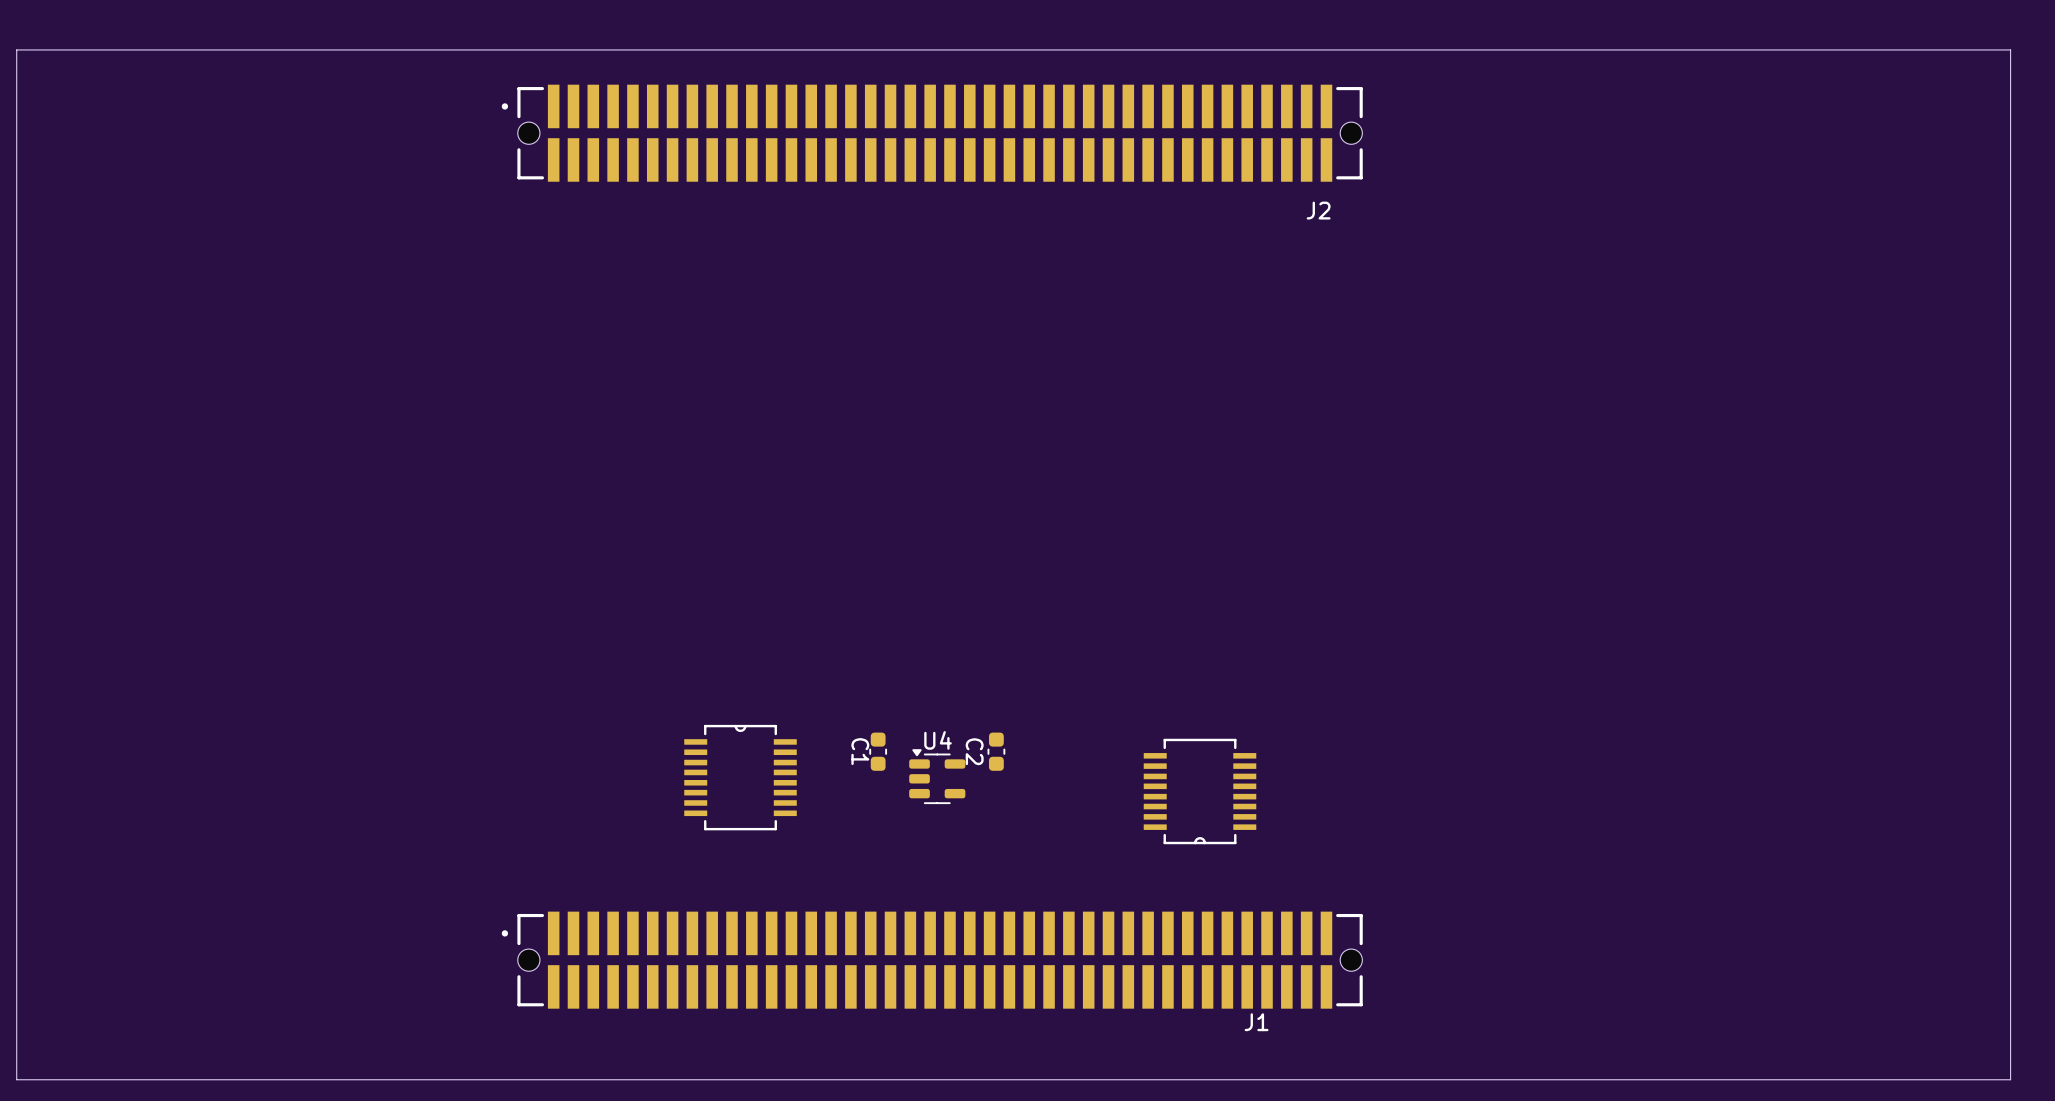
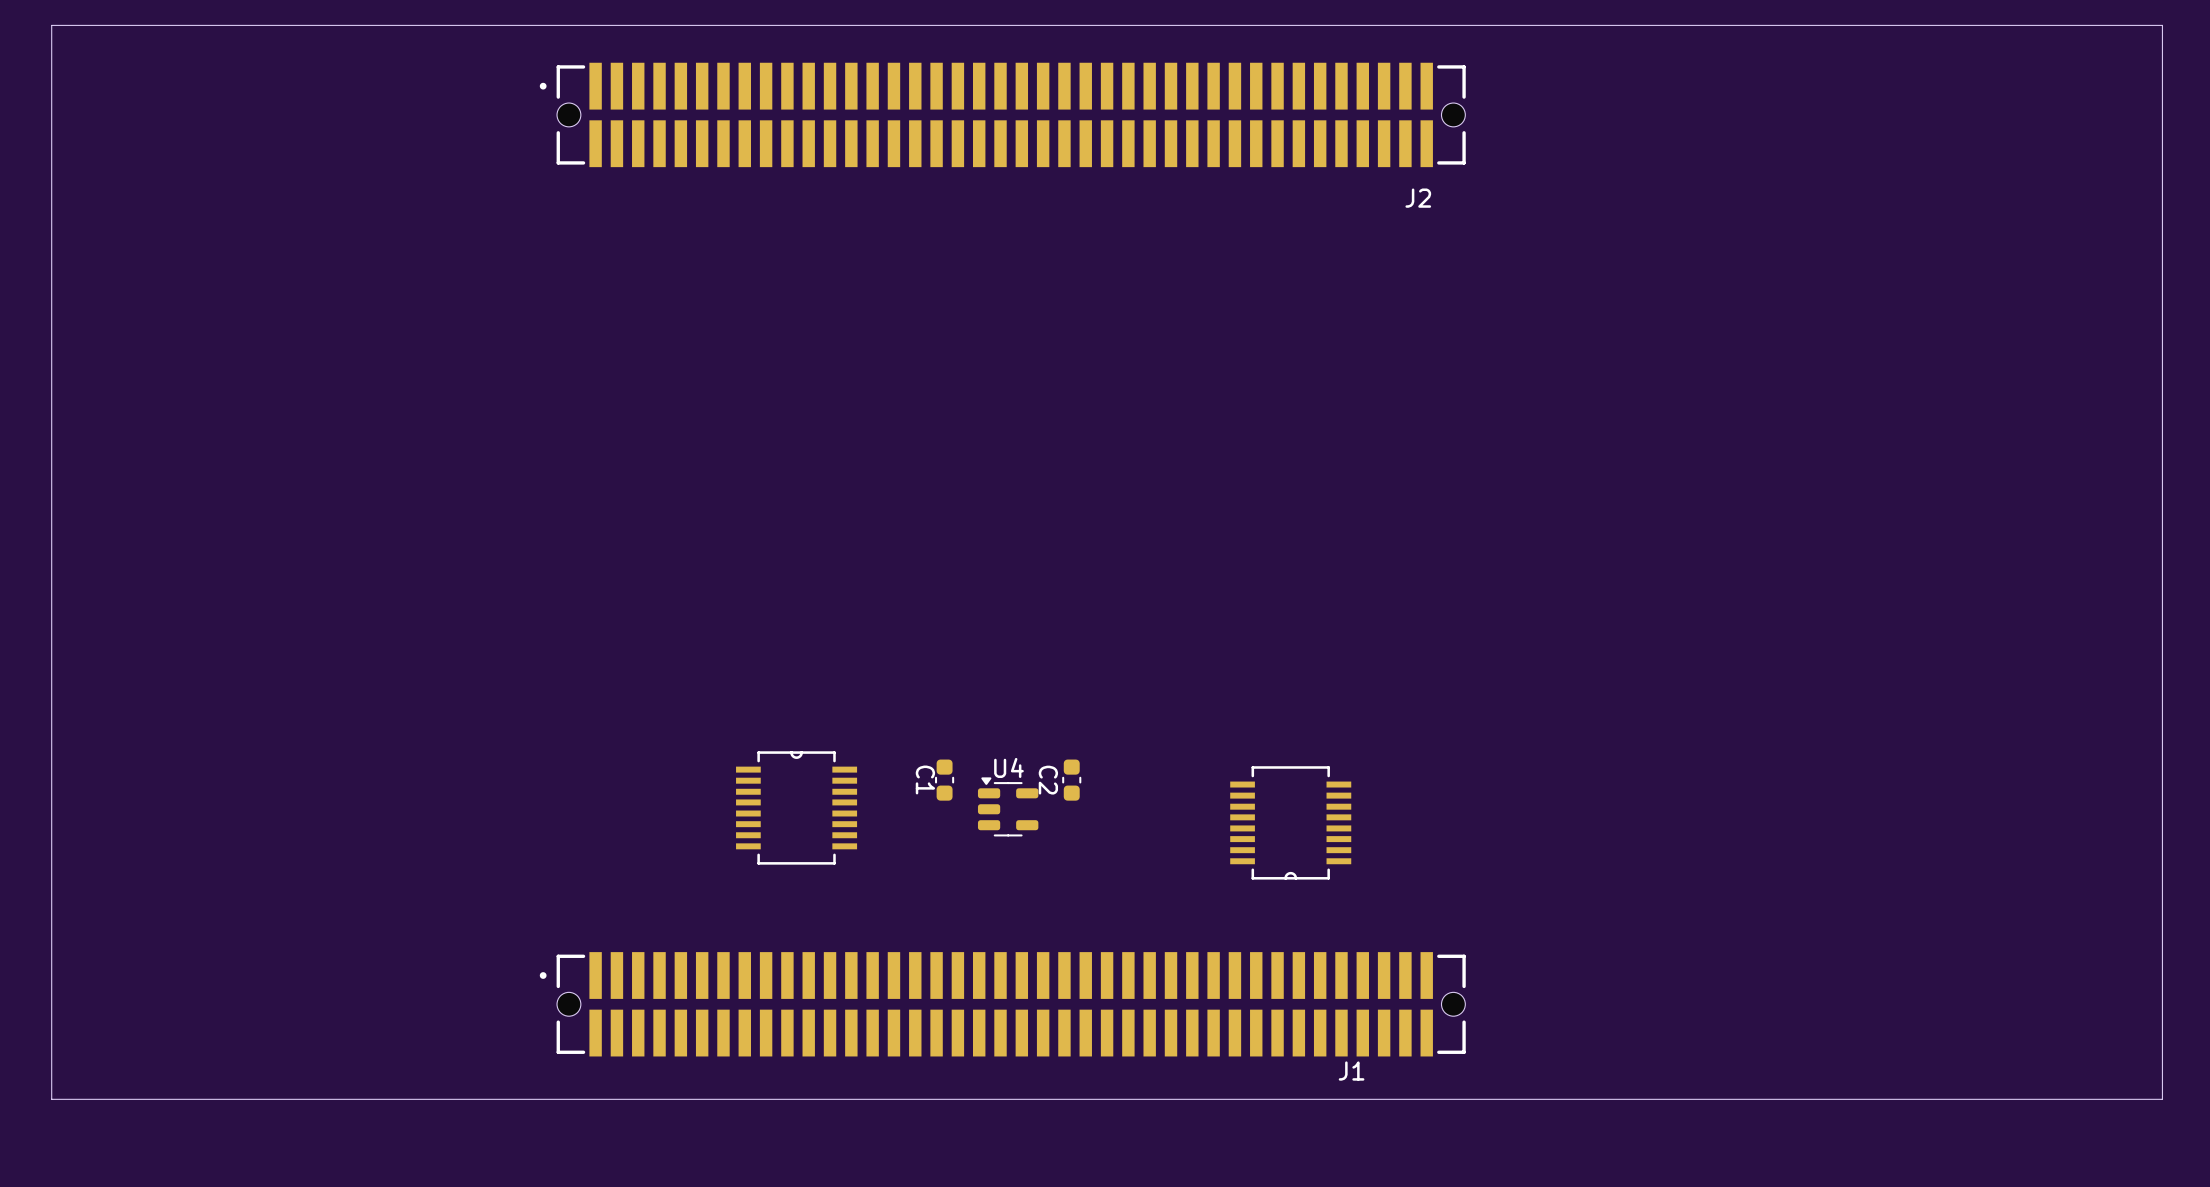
board edge: (47, 49) (16, 49) (16, 1079) (2010, 1079) (2010, 1048) -> (51, 25) (51, 1099) (2162, 1099)

